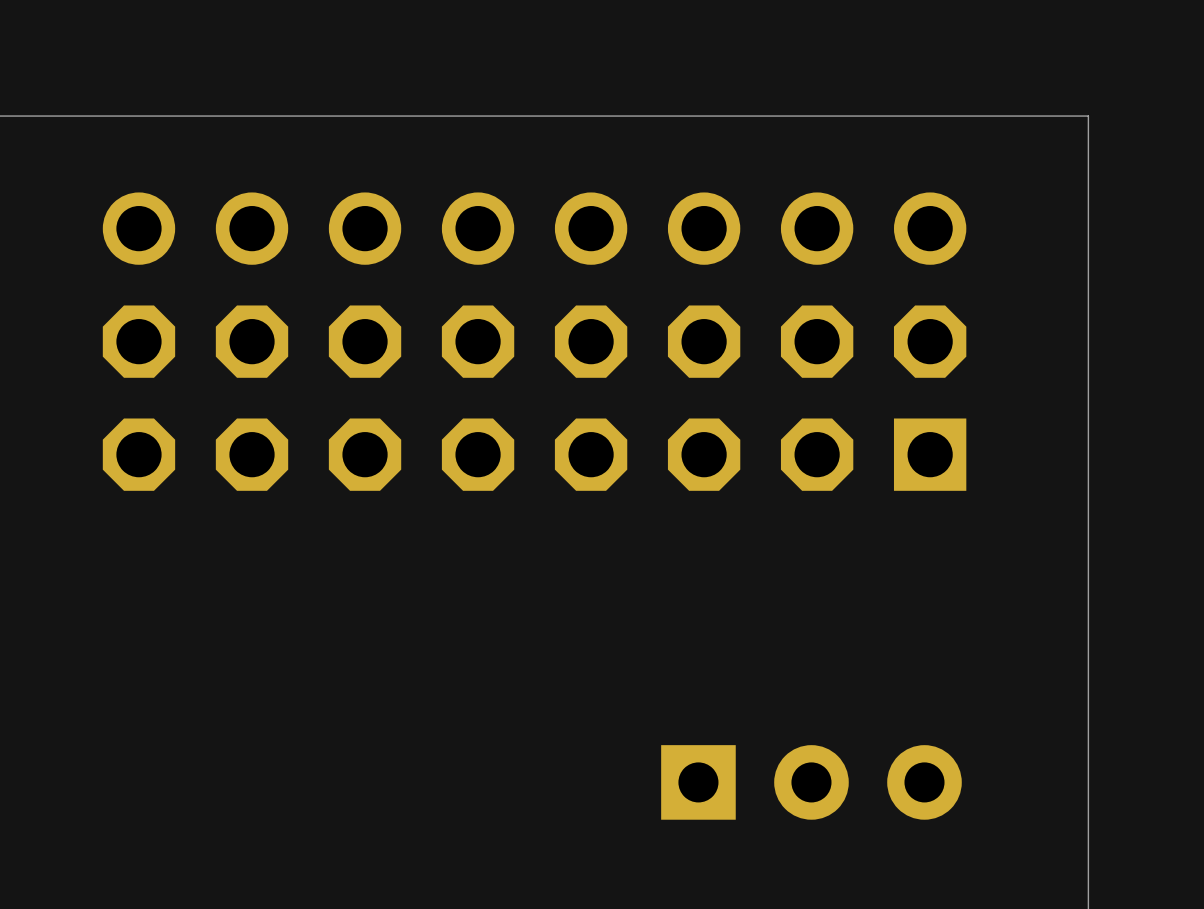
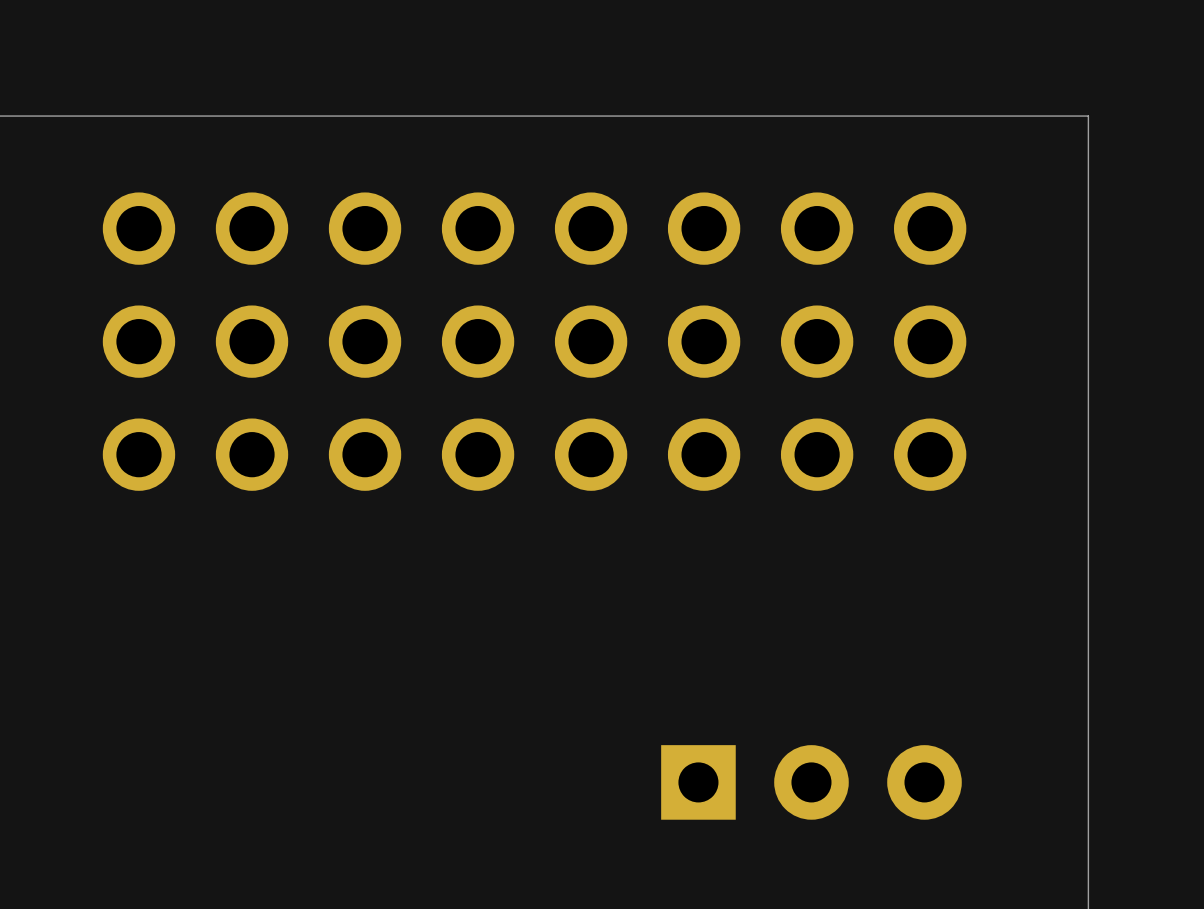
part footprint: [102, 305, 967, 491] -> [102, 305, 967, 491]

